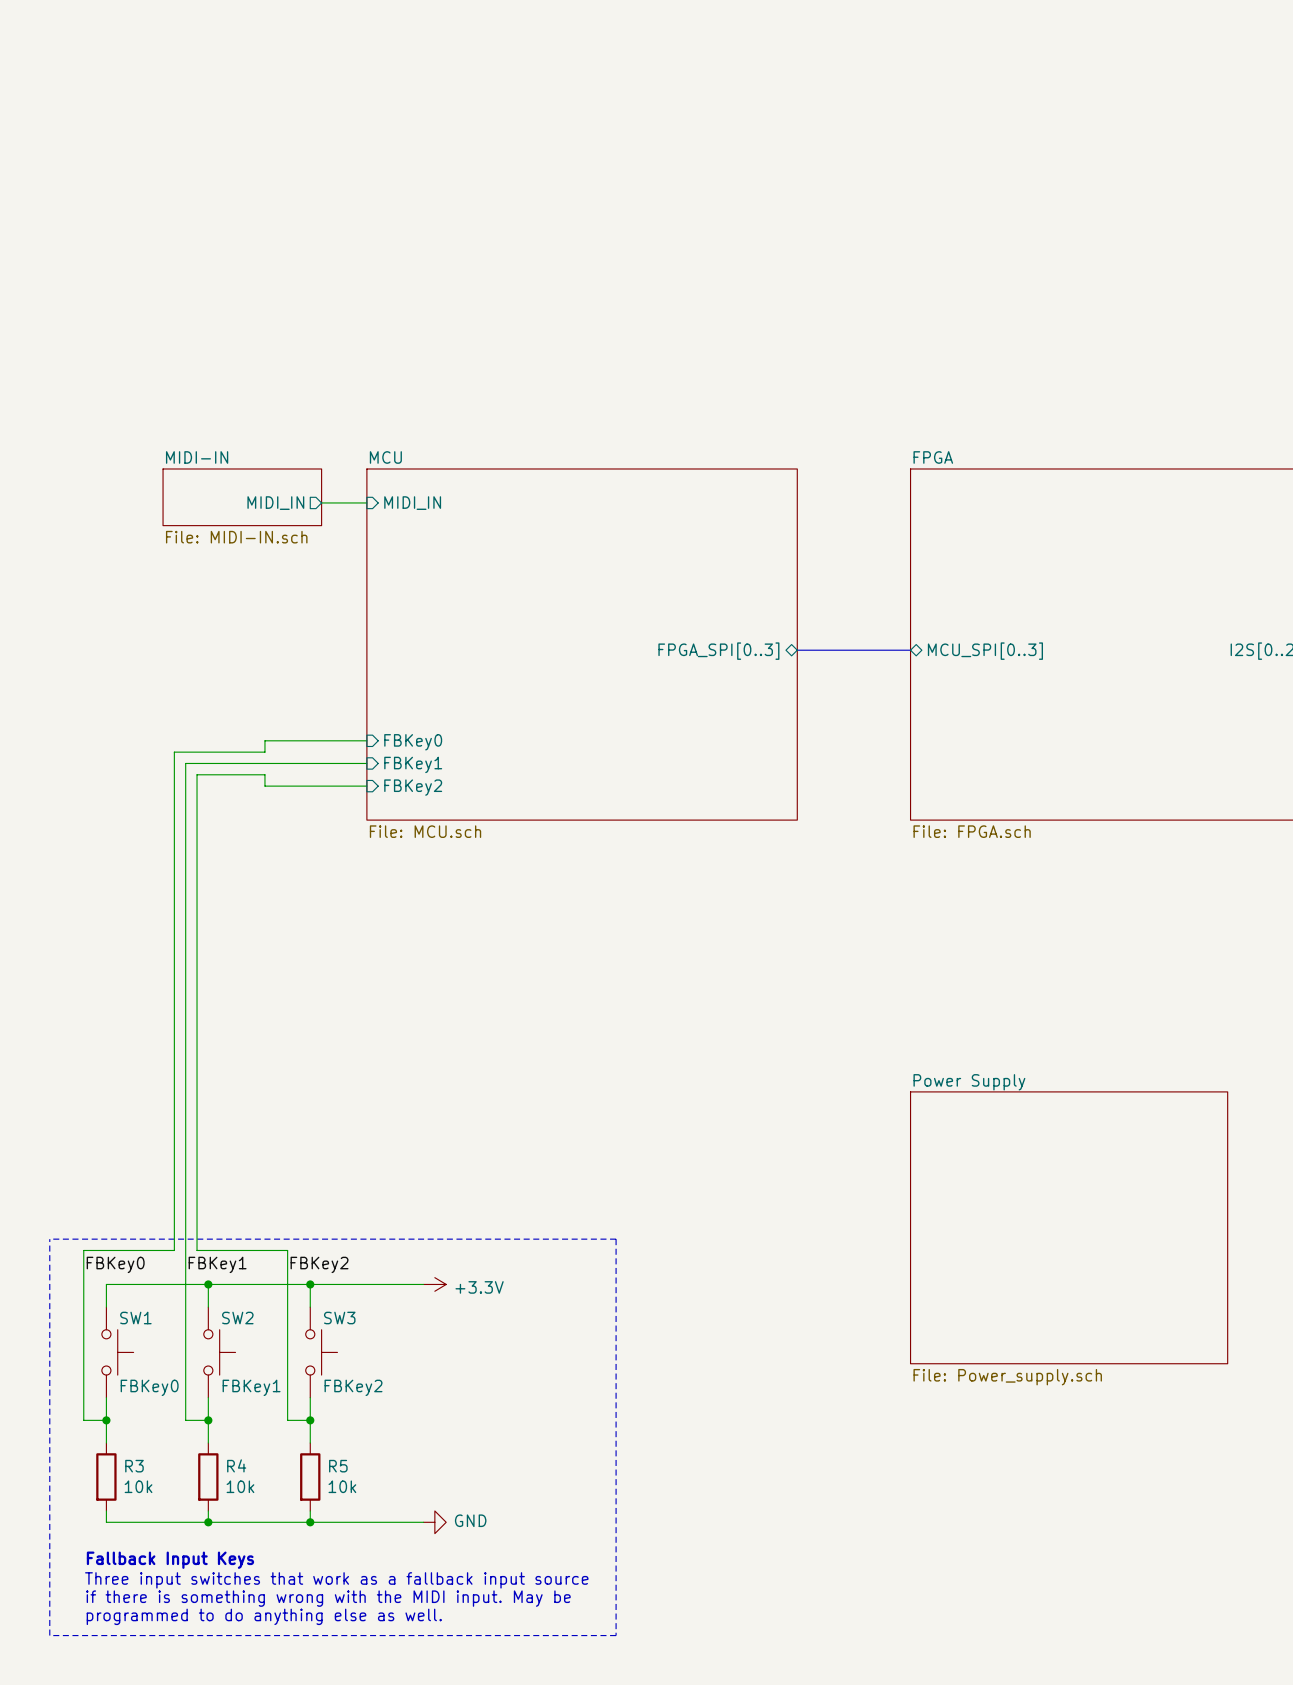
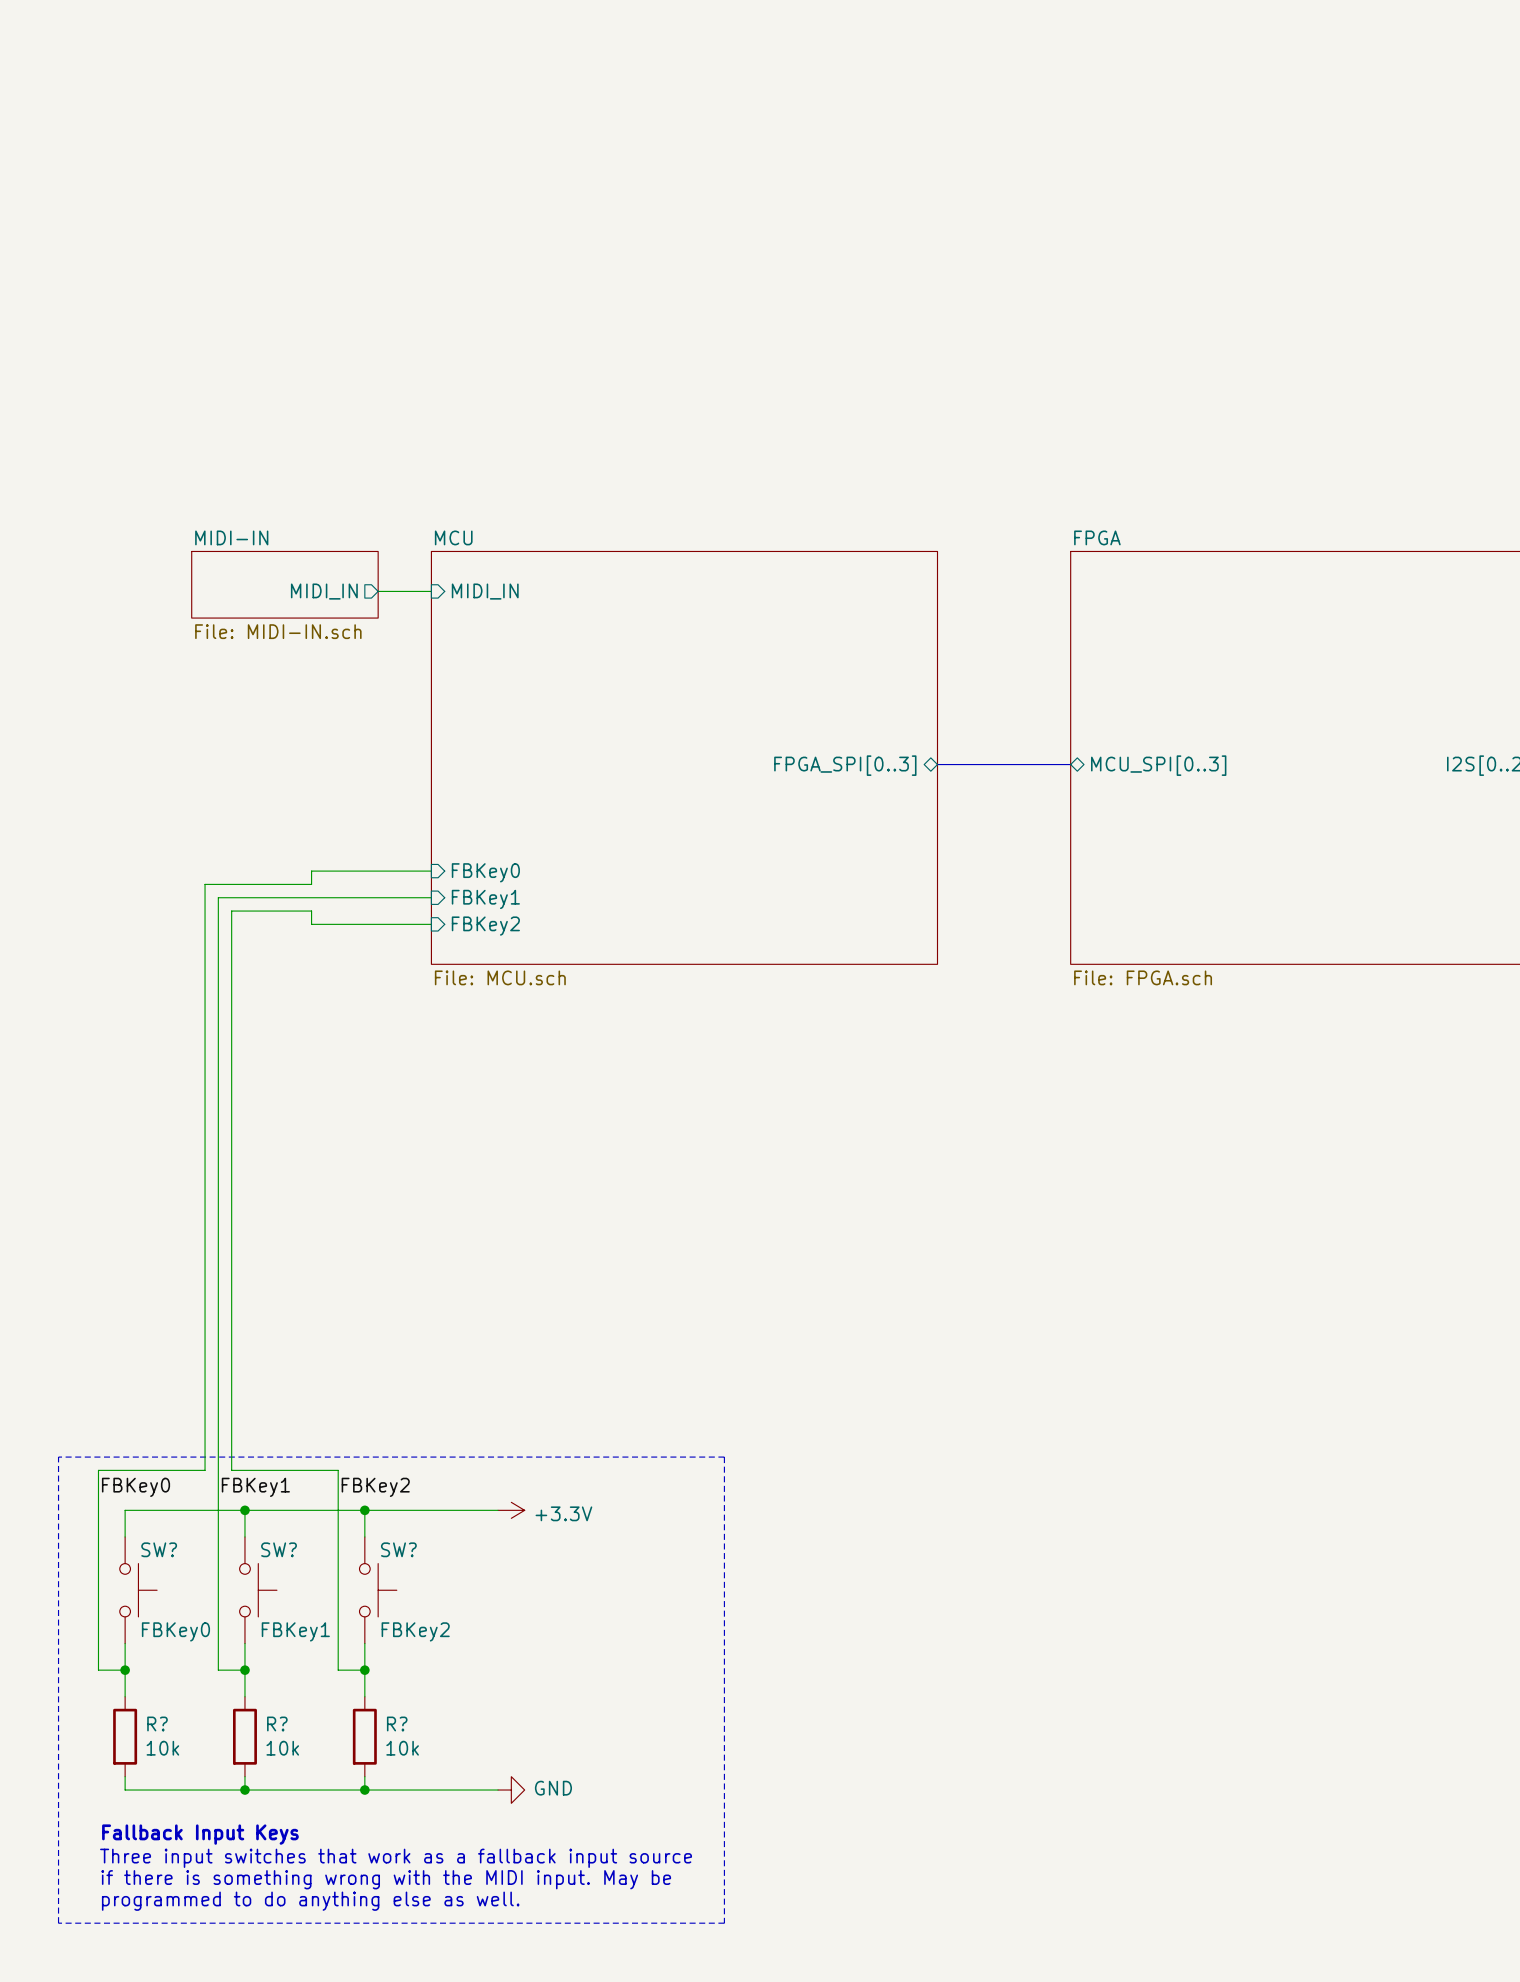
sheet Power Supply: File: Power_supply.sch (1069, 1227) -> none
SW1 name: SW1 (135, 1318) -> SW? (159, 1549)
SW2 name: SW2 (237, 1318) -> SW? (279, 1549)
SW3 name: SW3 (339, 1318) -> SW? (398, 1549)
R4 name: R4 (236, 1465) -> R? (277, 1723)
R3 name: R3 (134, 1466) -> R? (157, 1723)
R5 name: R5 (338, 1466) -> R? (397, 1723)

